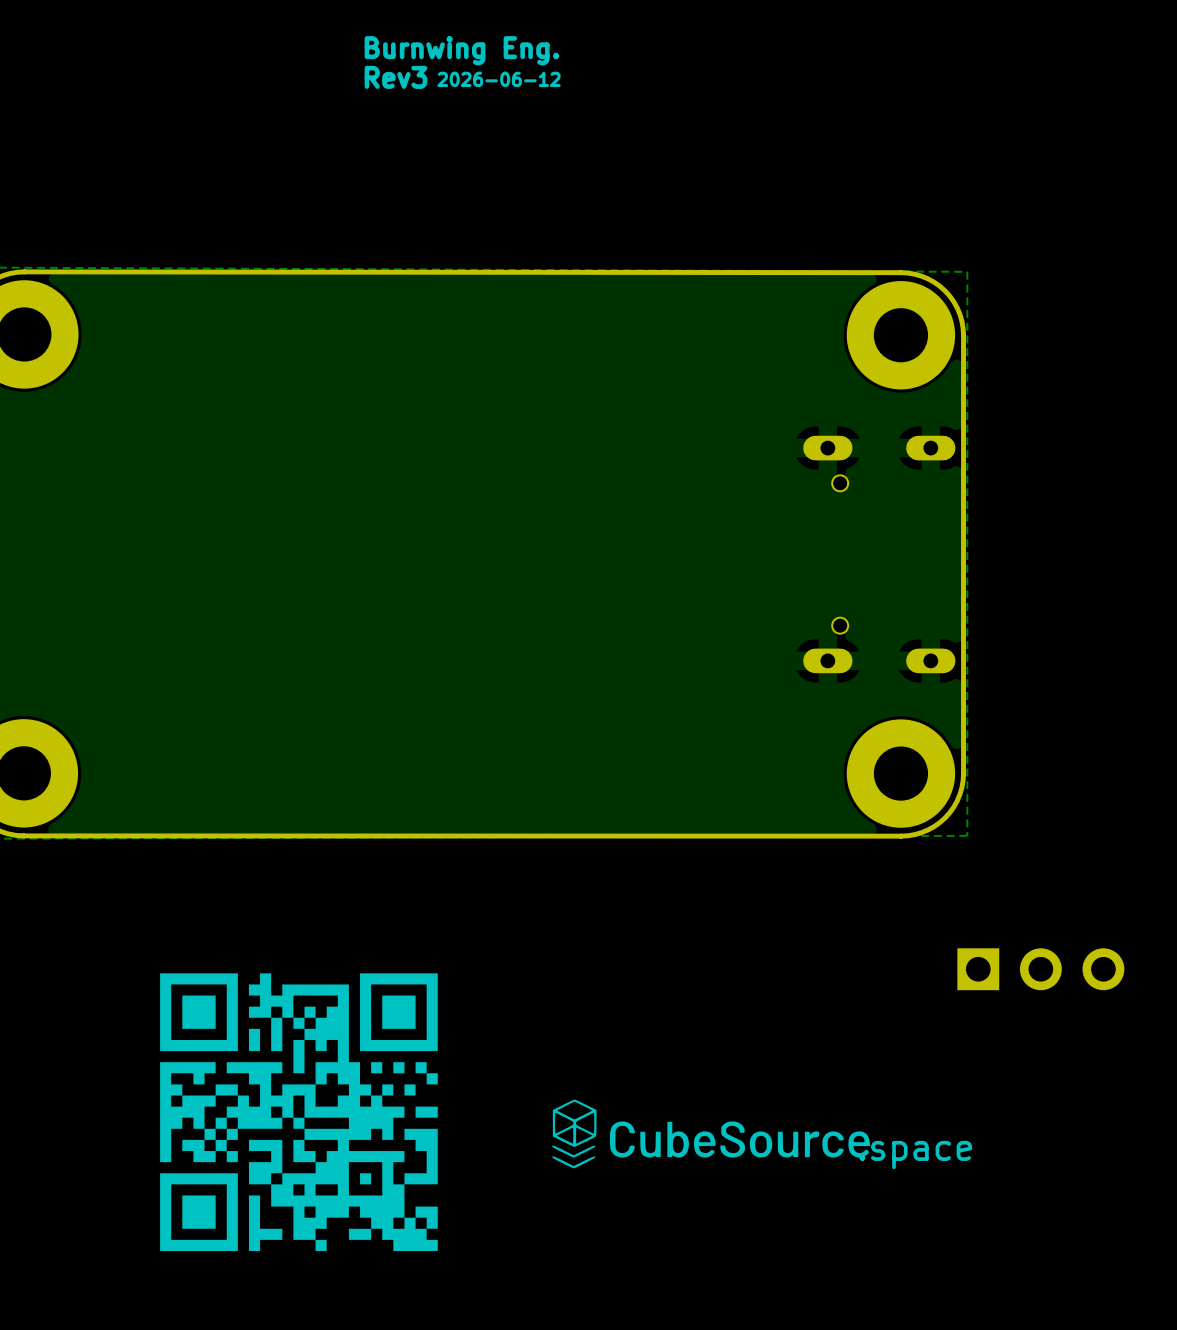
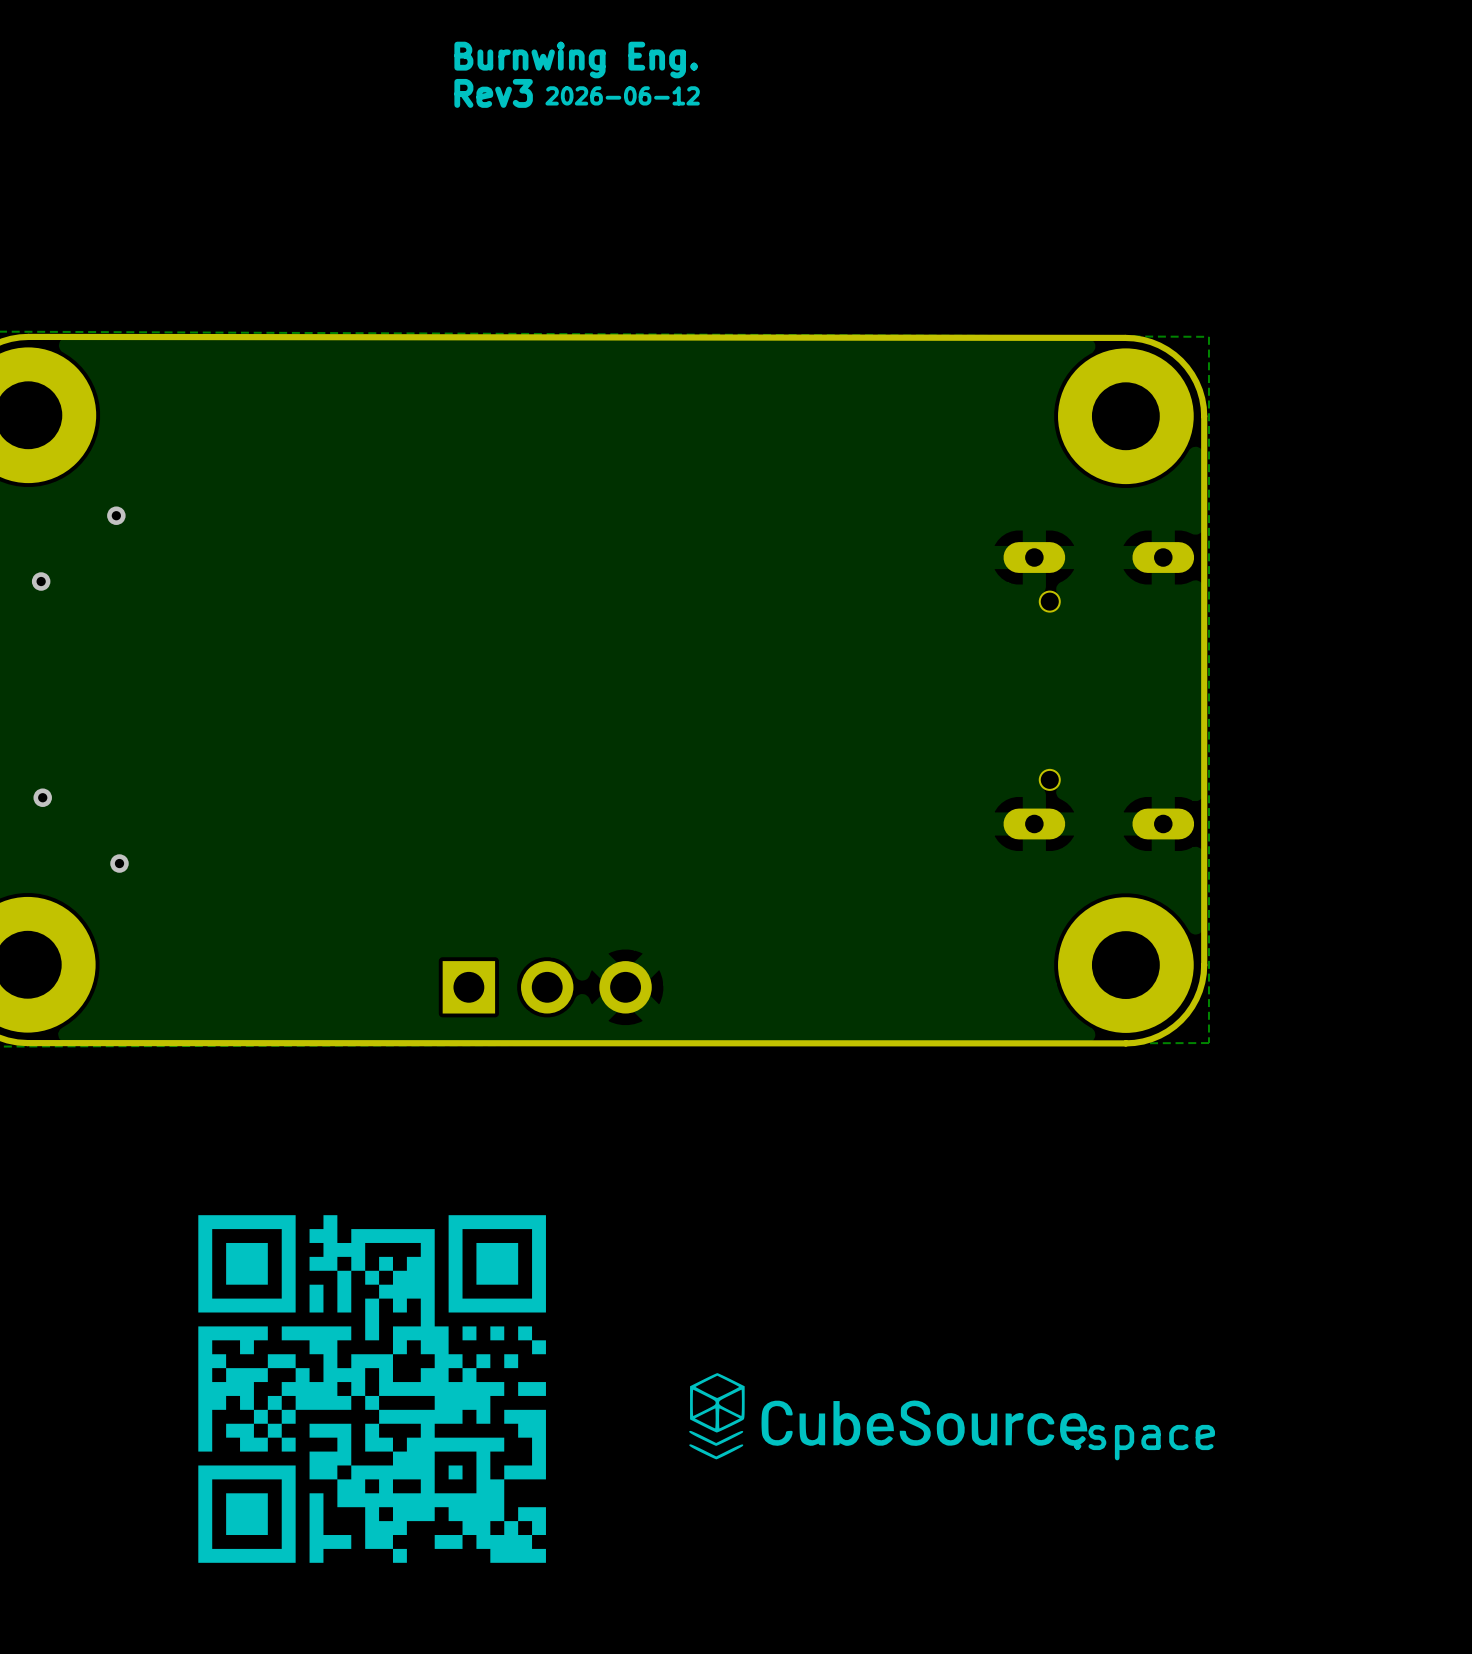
via: none -> (116, 515)
via: none -> (41, 581)
via: none -> (42, 797)
via: none -> (119, 863)
part: none -> (547, 987)
part: (1040, 969) -> none

